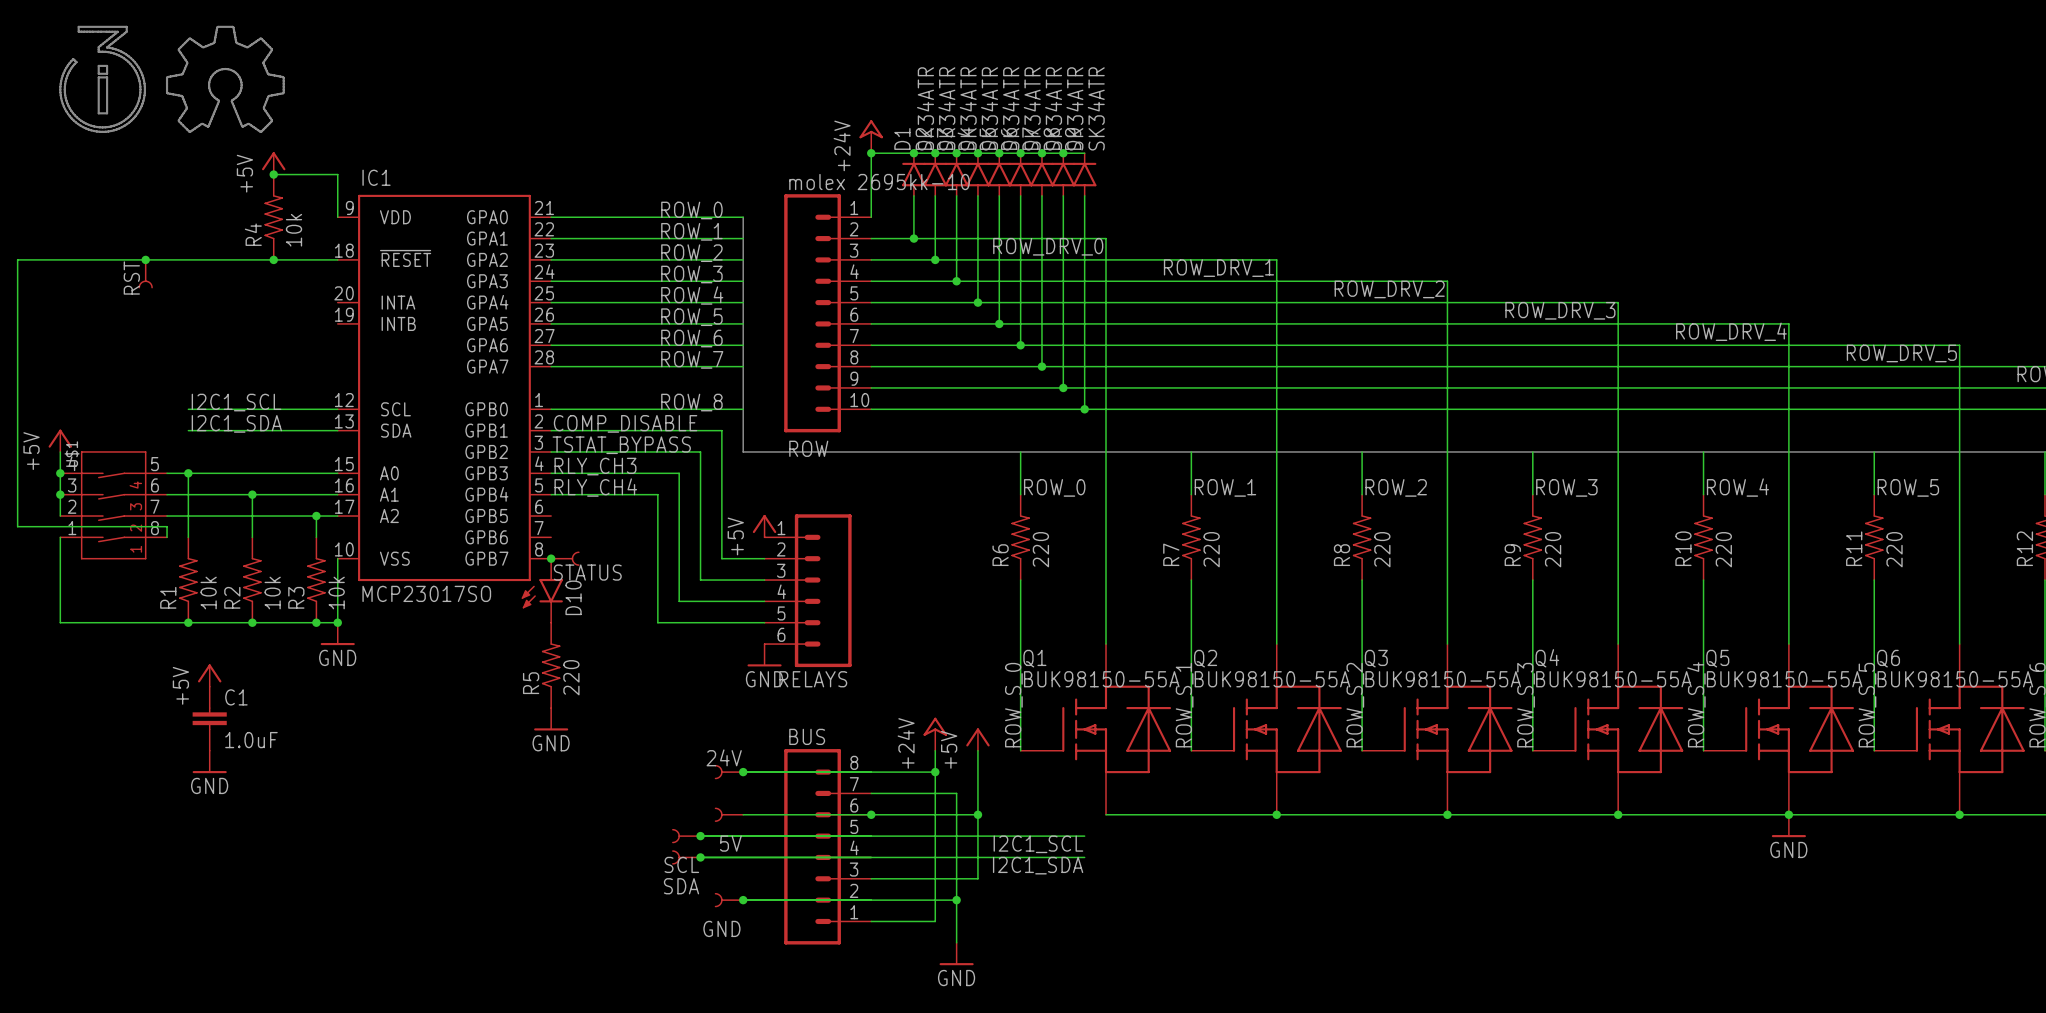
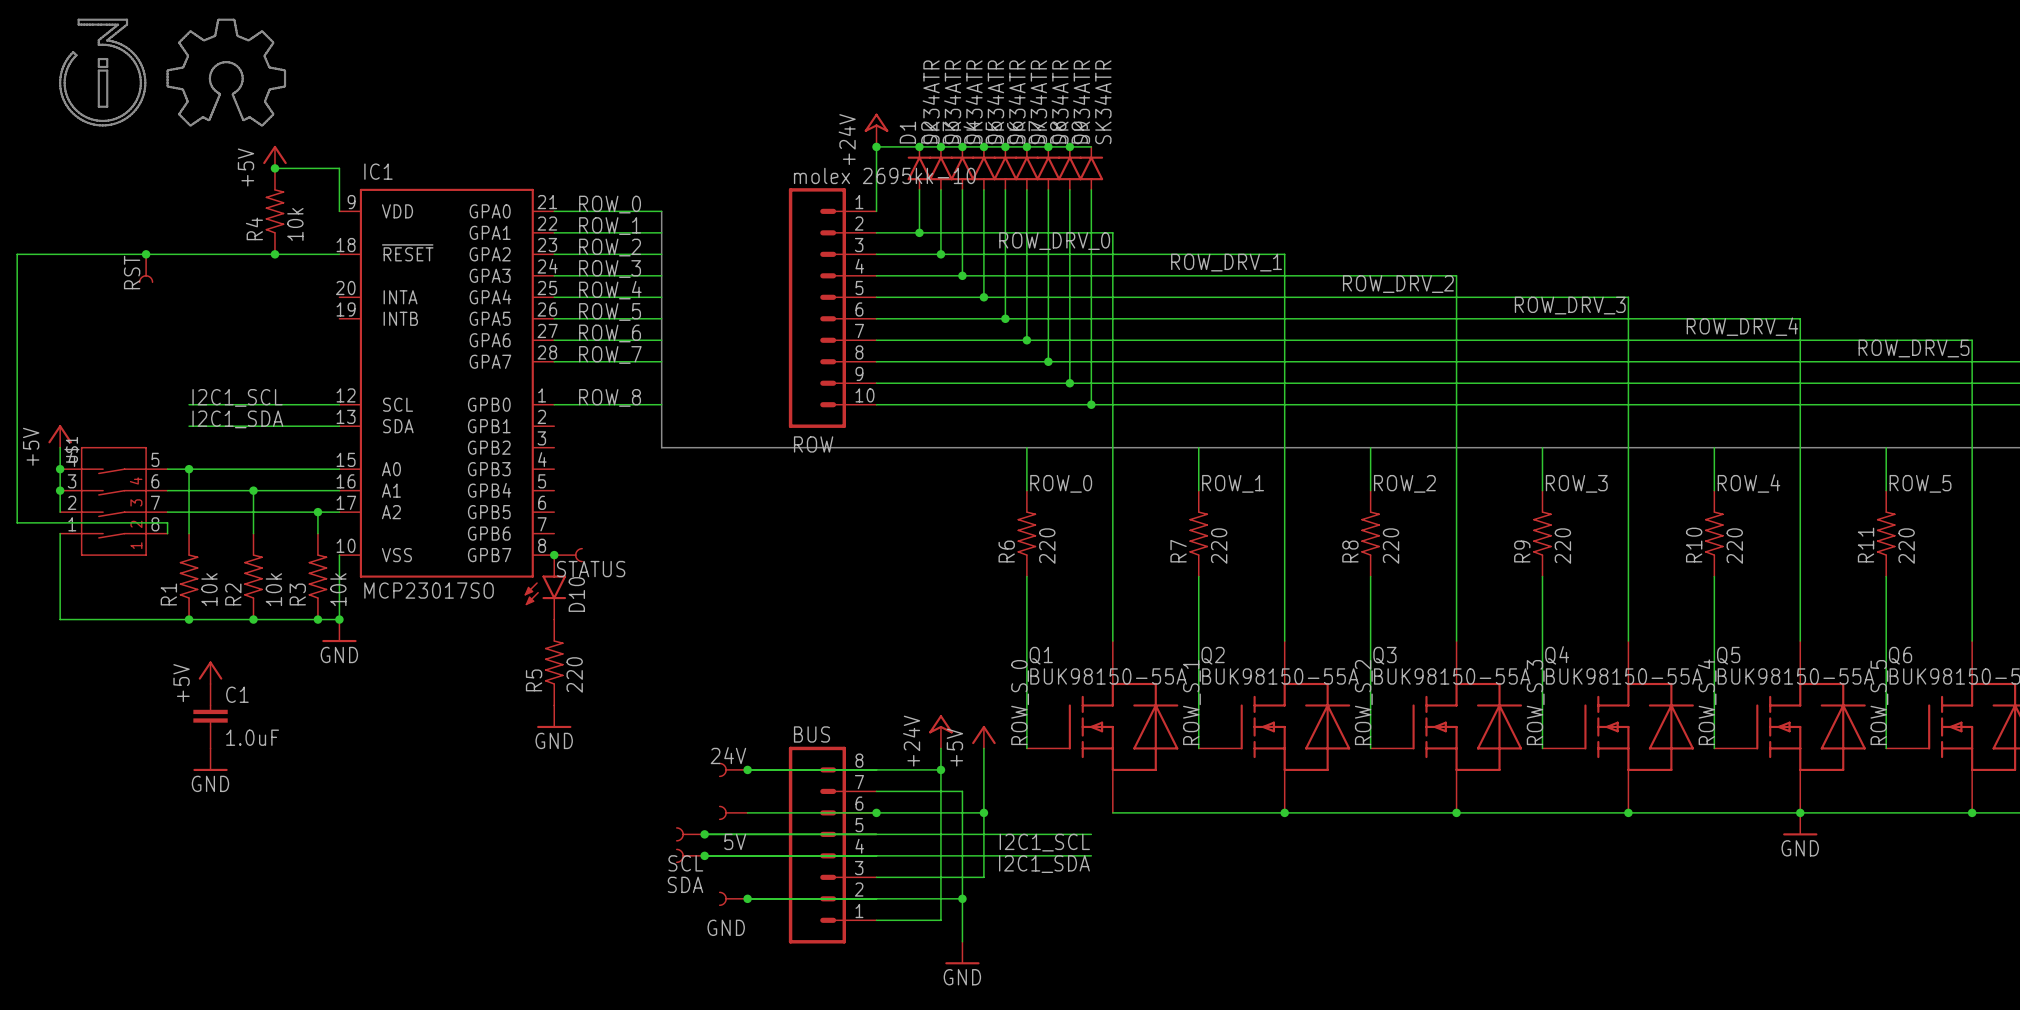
label position: ROW_0 (691, 210) -> ROW_0 (610, 204)
wire: (657, 217) (743, 217) -> none
bus: (743, 217) (743, 451) -> (661, 211) (661, 447) (747, 447)
label position: ROW_1 (691, 231) -> ROW_1 (610, 226)
wire: (657, 238) (743, 238) -> none
label position: ROW_2 (691, 253) -> ROW_2 (610, 247)
wire: (657, 259) (743, 259) -> none
label position: ROW_3 (691, 274) -> ROW_3 (610, 269)
wire: (657, 281) (743, 281) -> none
label position: ROW_4 (692, 295) -> ROW_4 (610, 290)
wire: (657, 302) (743, 302) -> none
label position: ROW_5 (691, 317) -> ROW_5 (610, 311)
wire: (657, 323) (743, 323) -> none
label position: ROW_6 (691, 338) -> ROW_6 (610, 333)
wire: (657, 345) (743, 345) -> none
label position: ROW_7 (692, 359) -> ROW_7 (610, 354)
wire: (657, 366) (743, 366) -> none
label position: ROW_8 (691, 402) -> ROW_8 (610, 397)
wire: (657, 409) (743, 409) -> none
label: COMP_DISABLE (625, 423) -> none
wire: (551, 430) (721, 430) (721, 558) (764, 558) -> none
label: TSTAT_BYPASS (621, 445) -> none
wire: (551, 451) (700, 451) (700, 580) (764, 580) -> none
label: RLY_CH3 (595, 466) -> none
wire: (551, 473) (679, 473) (679, 601) (764, 601) -> none
label: RLY_CH4 (595, 487) -> none
wire: (551, 494) (657, 494) (657, 622) (764, 622) -> none
power symbol: +5V (764, 526) -> none
RELAYS: (808, 590) -> none
power symbol: GND (764, 655) -> none

